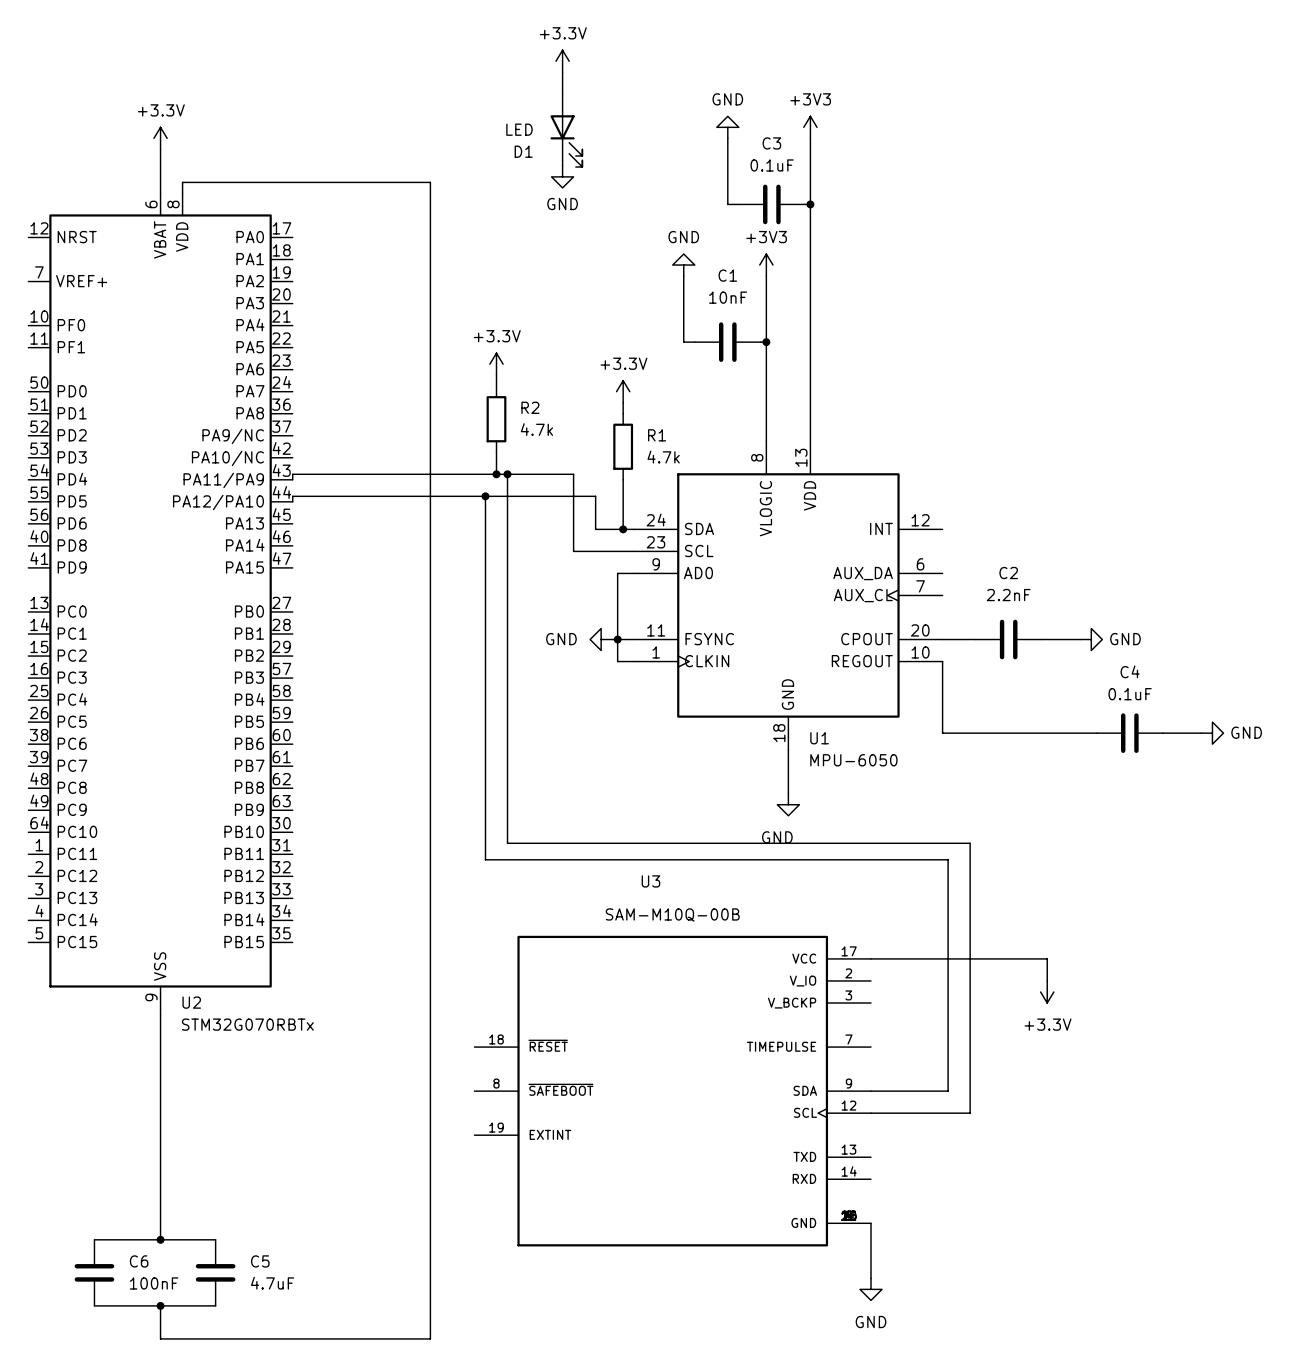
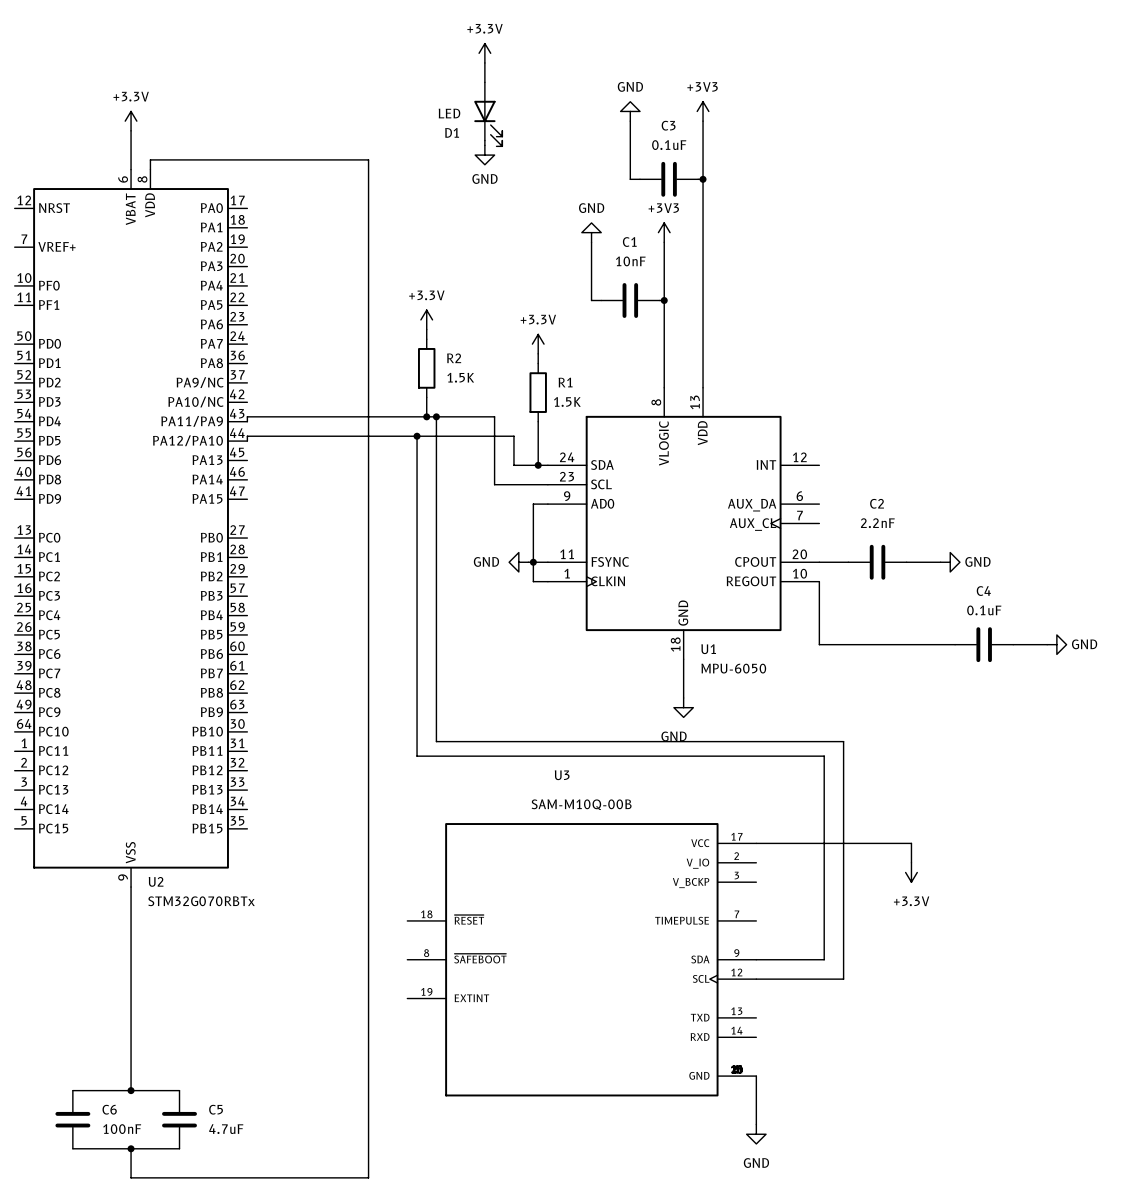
R2 value: 4.7k (536, 429) -> 1.5K (460, 377)
R1 value: 4.7k (663, 457) -> 1.5K (567, 401)

